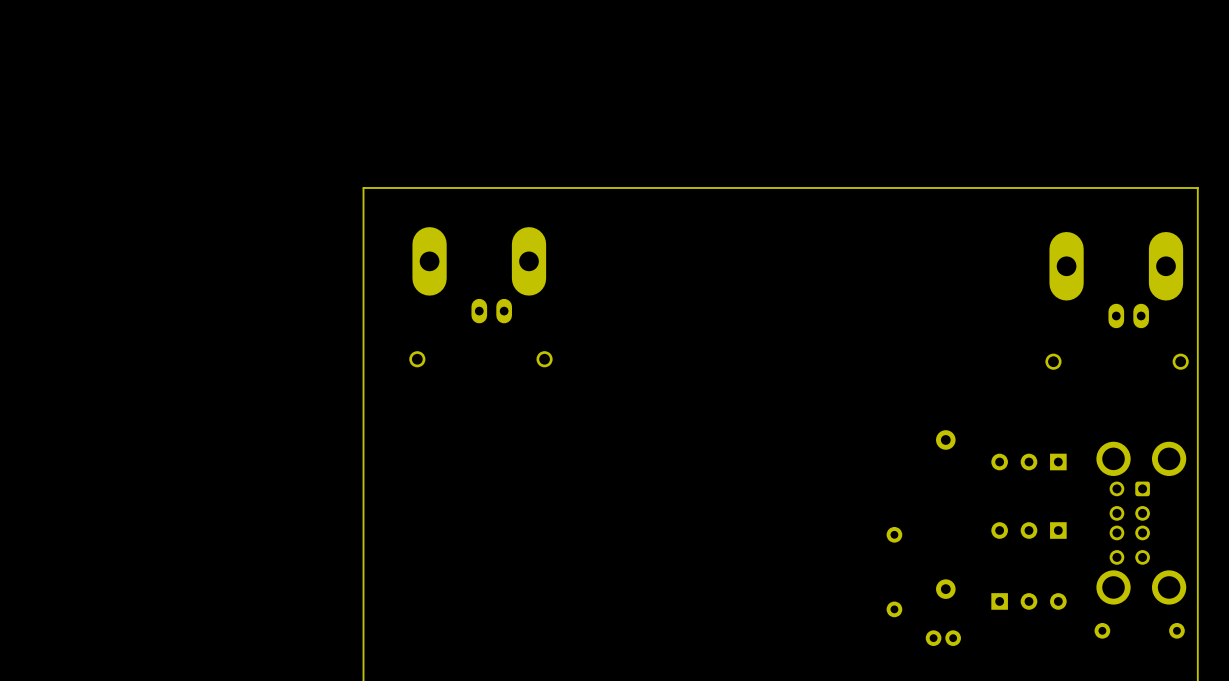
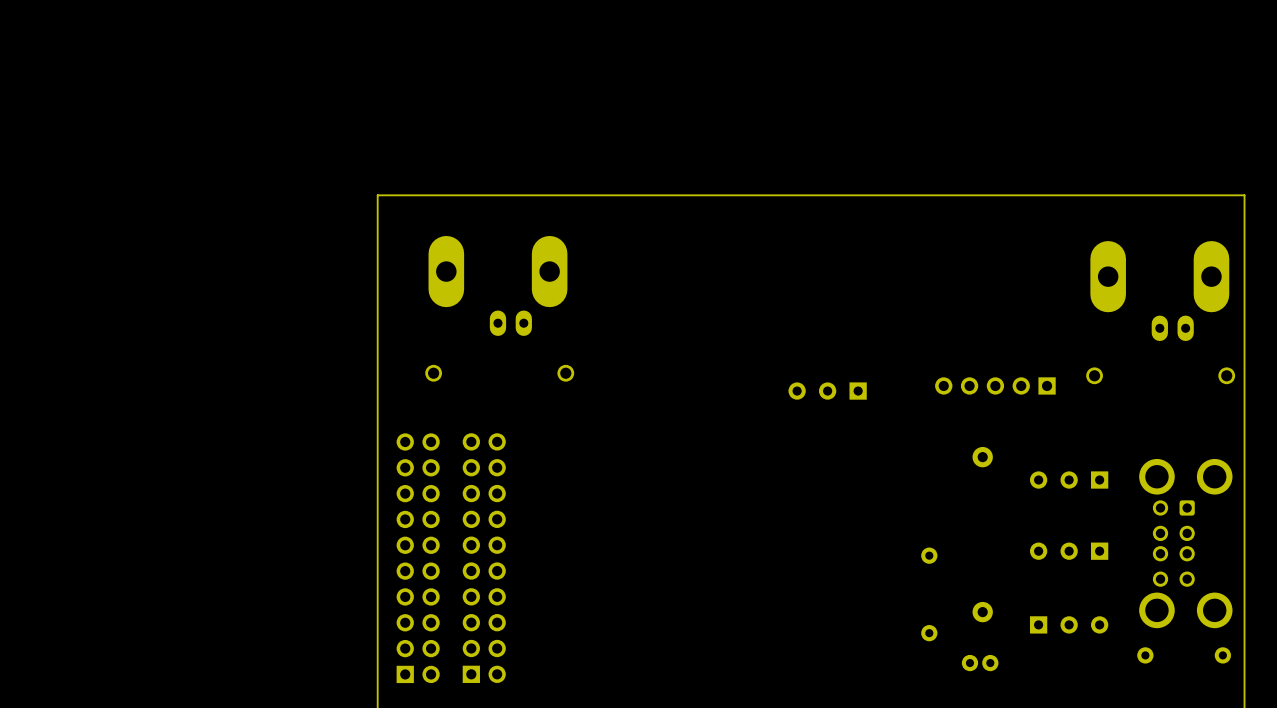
part: none -> (995, 385)
part: none -> (827, 391)
part: none -> (418, 558)
part: none -> (484, 558)

